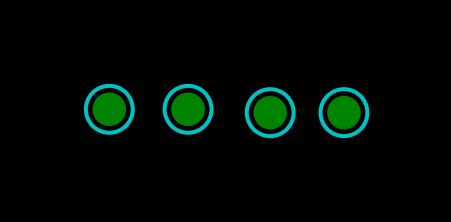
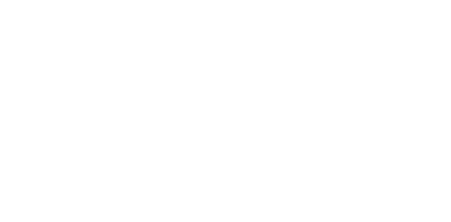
part: (109, 109) -> none
part: (188, 109) -> none
part: (270, 112) -> none
part: (343, 112) -> none

